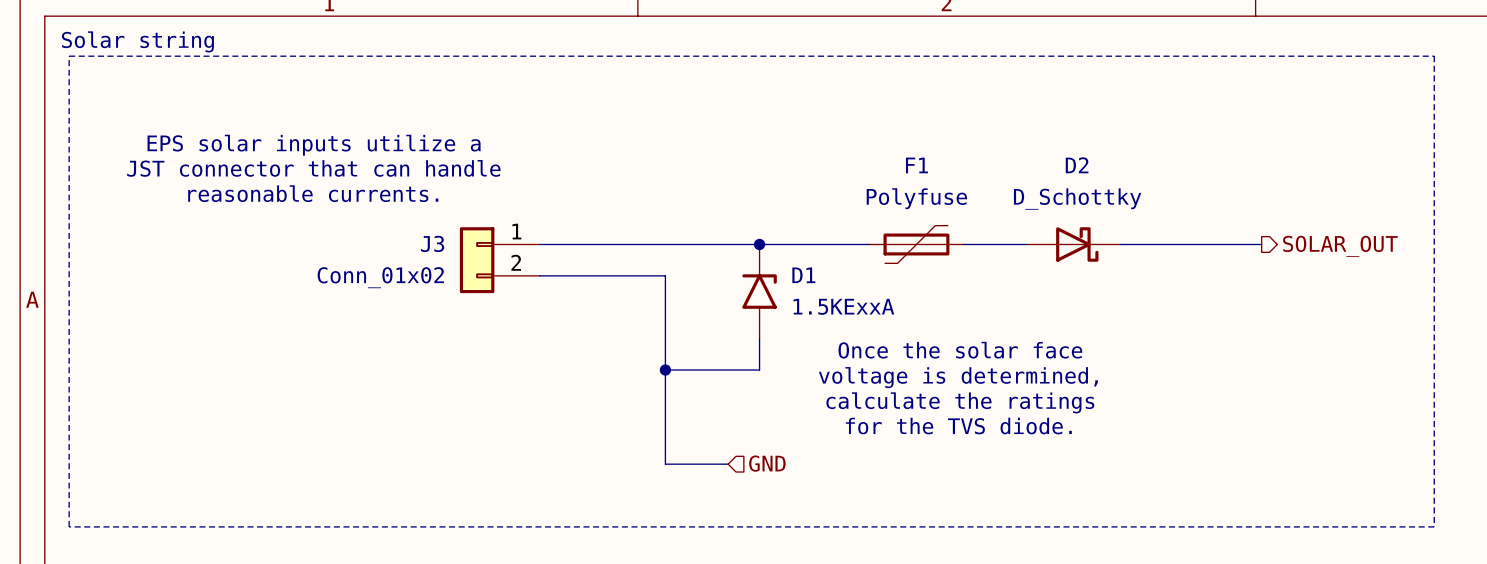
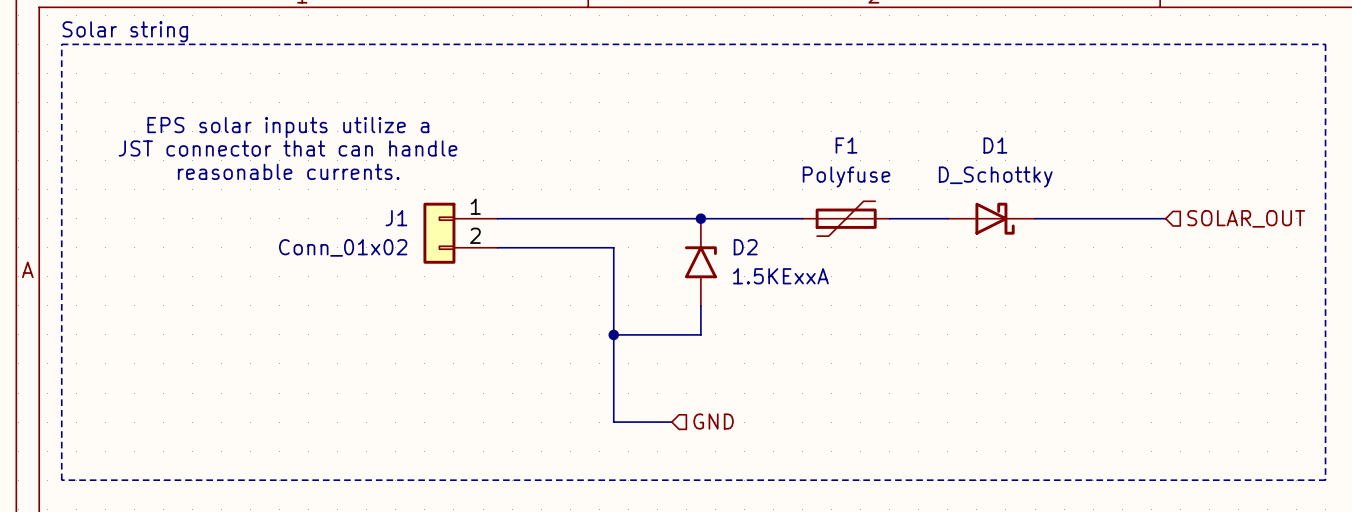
D2 name: D2 (1077, 165) -> D1 (995, 145)
J3 name: J3 (432, 243) -> J1 (396, 218)
hierarchical label shape: output (1340, 246) -> input (1246, 218)
D1 name: D1 (803, 275) -> D2 (745, 247)
text: Once the solar face (960, 350) -> none
text: voltage is determined, (958, 377) -> none
text: calculate the ratings (960, 402) -> none
text: for the TVS diode. (958, 426) -> none

